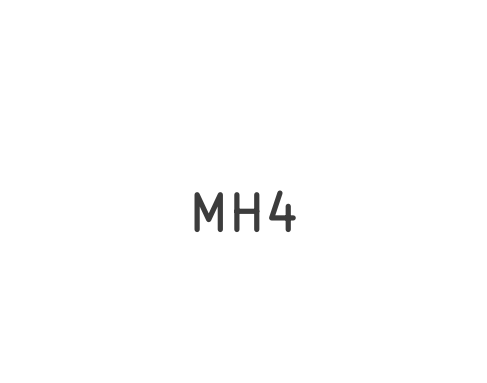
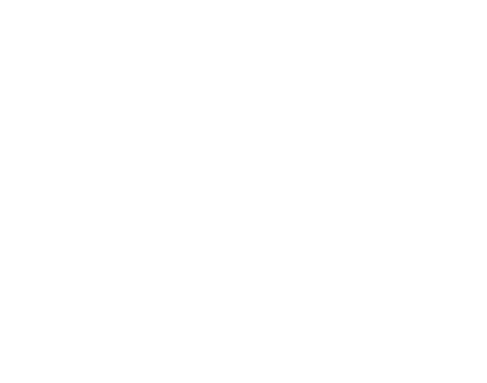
MH4: (245, 211) -> none

